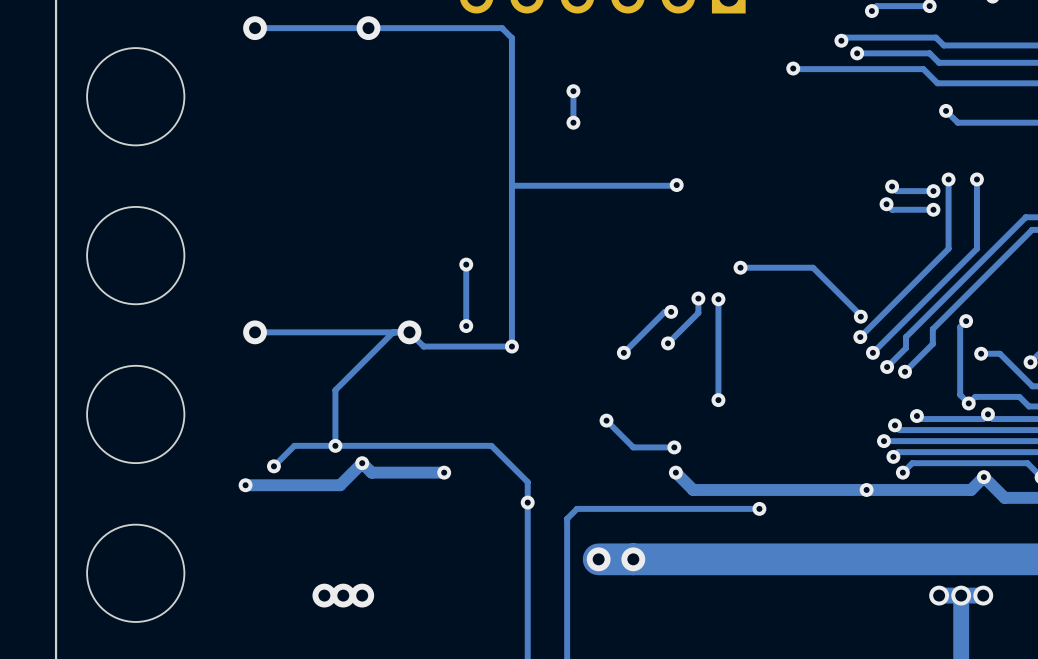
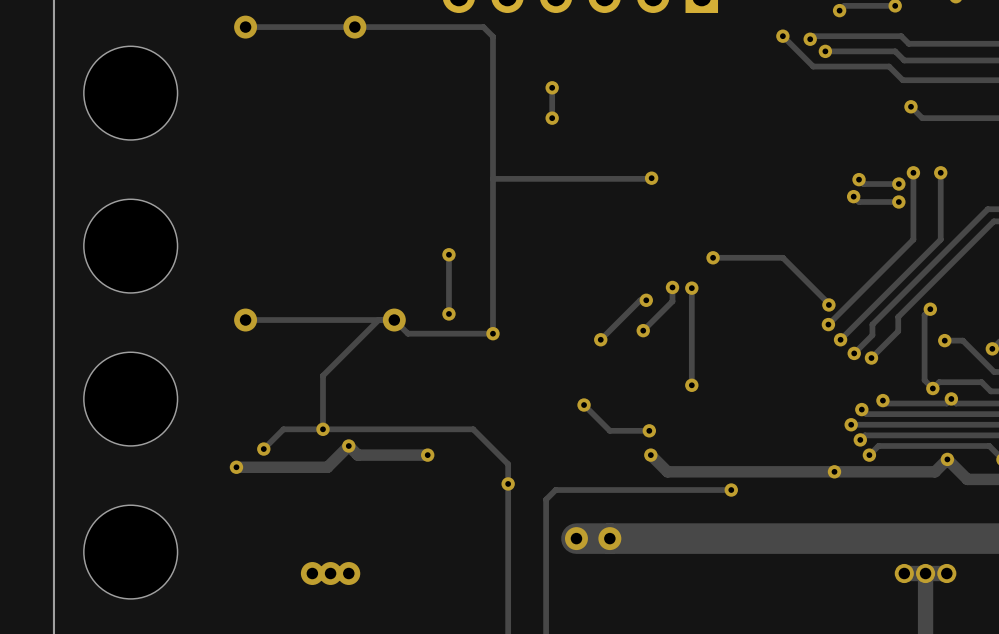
via: none -> (782, 36)
track: (793, 68) (844, 69) -> (782, 36) (813, 66)
via: (793, 68) -> none

